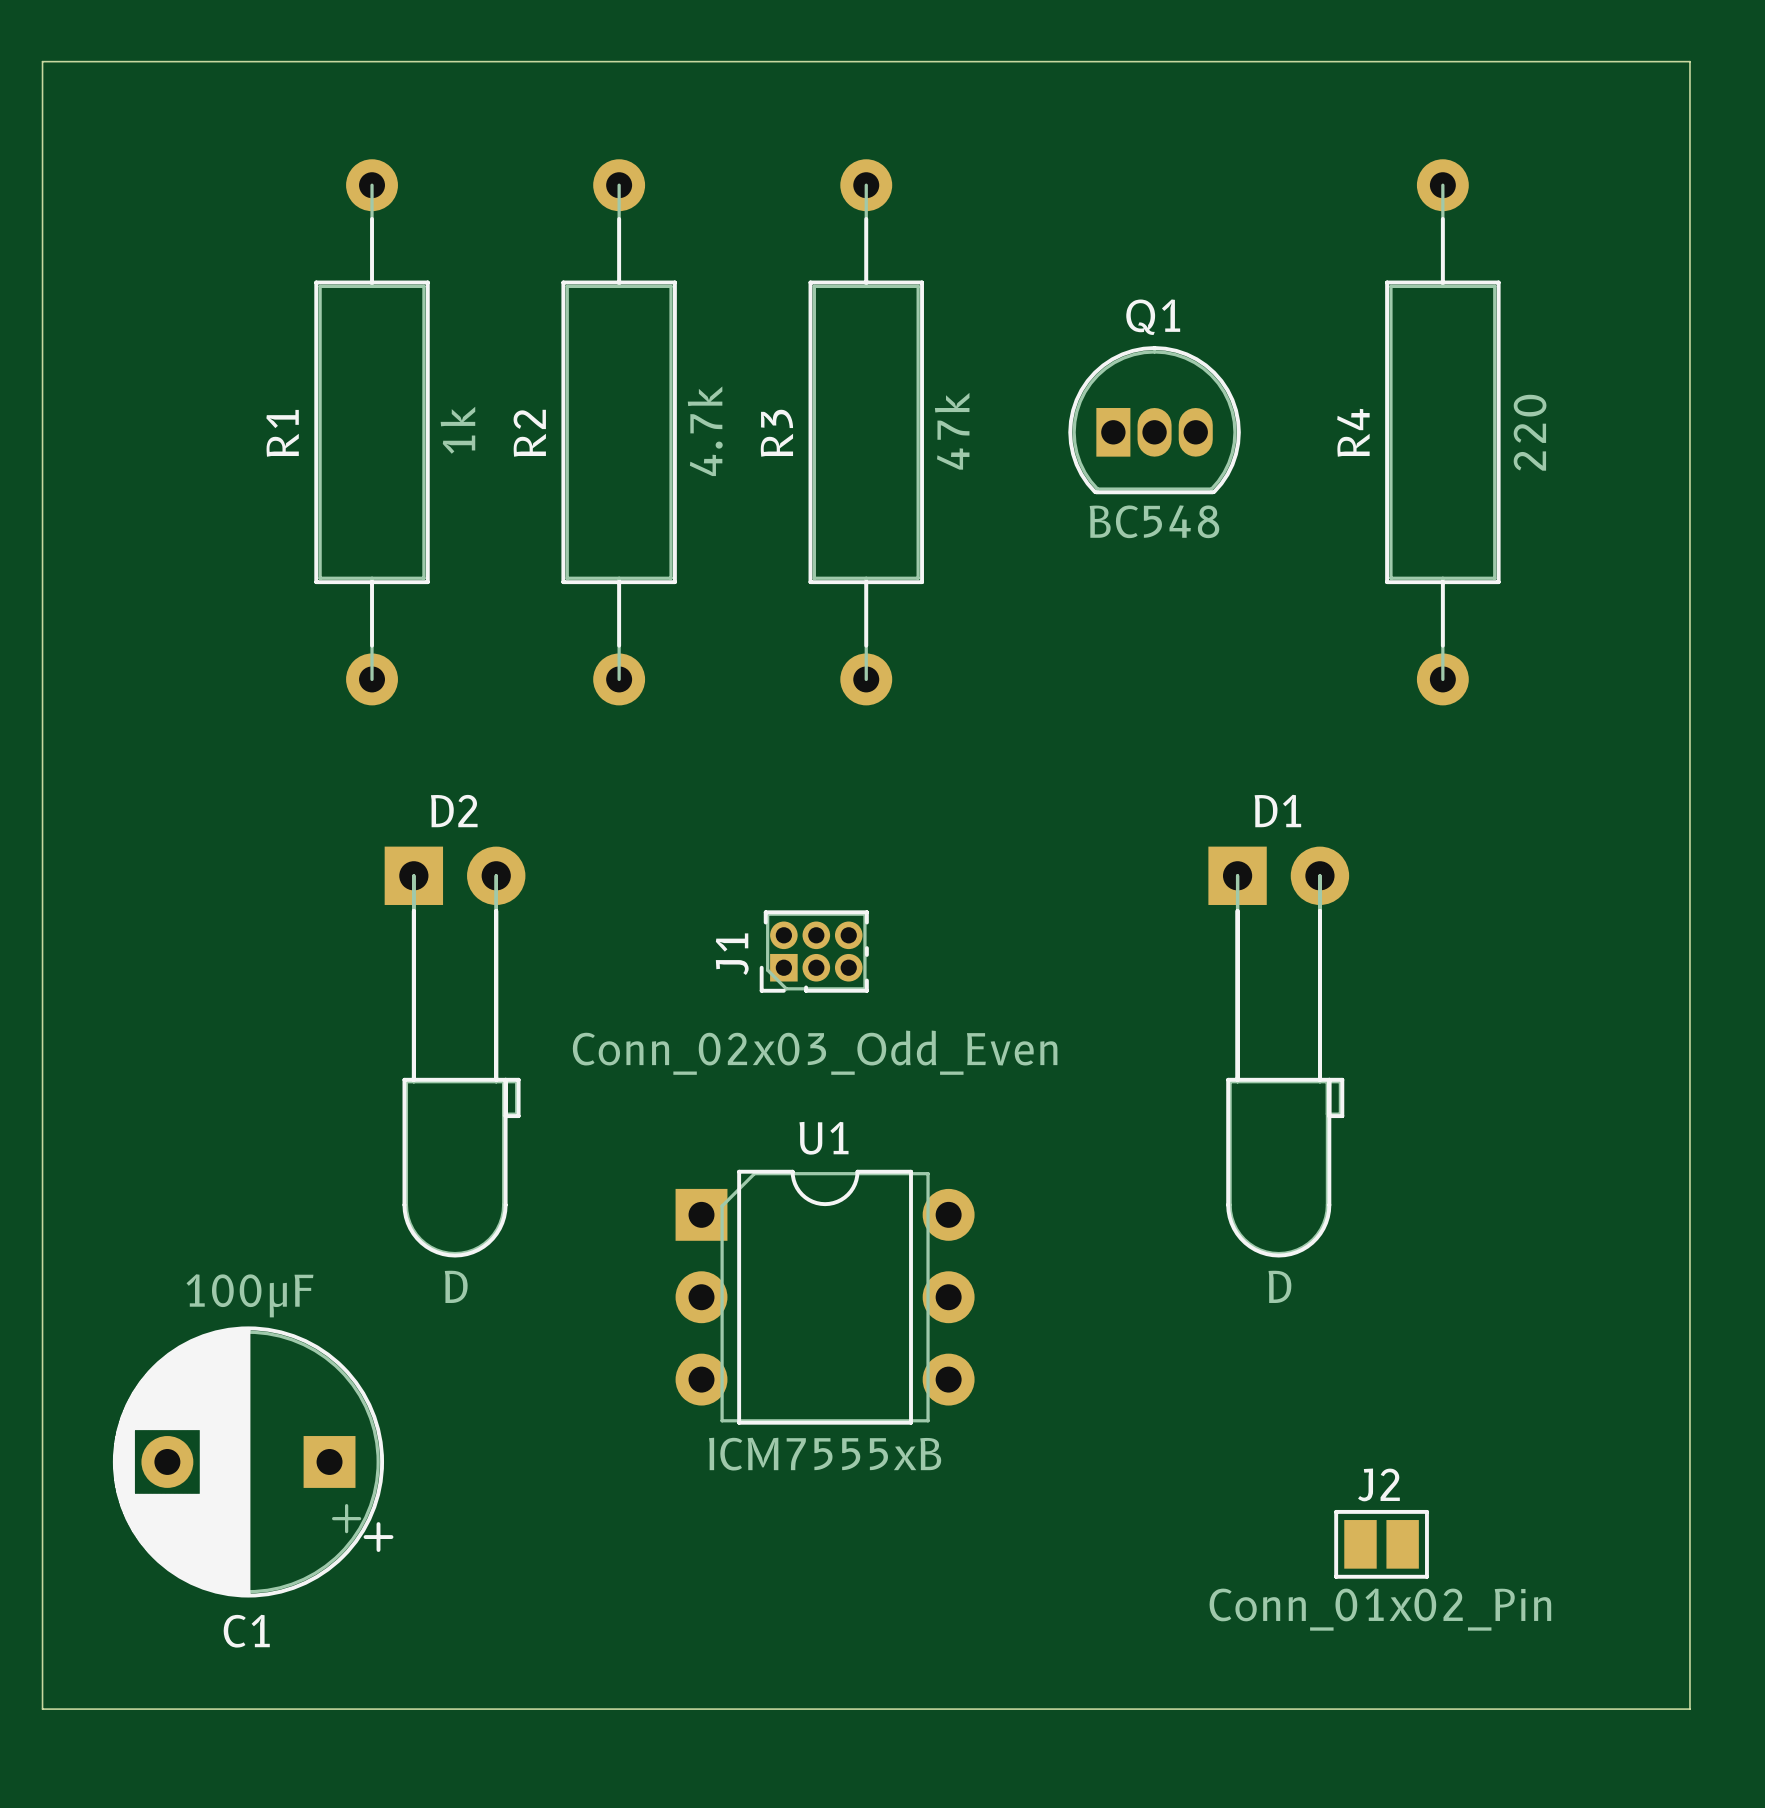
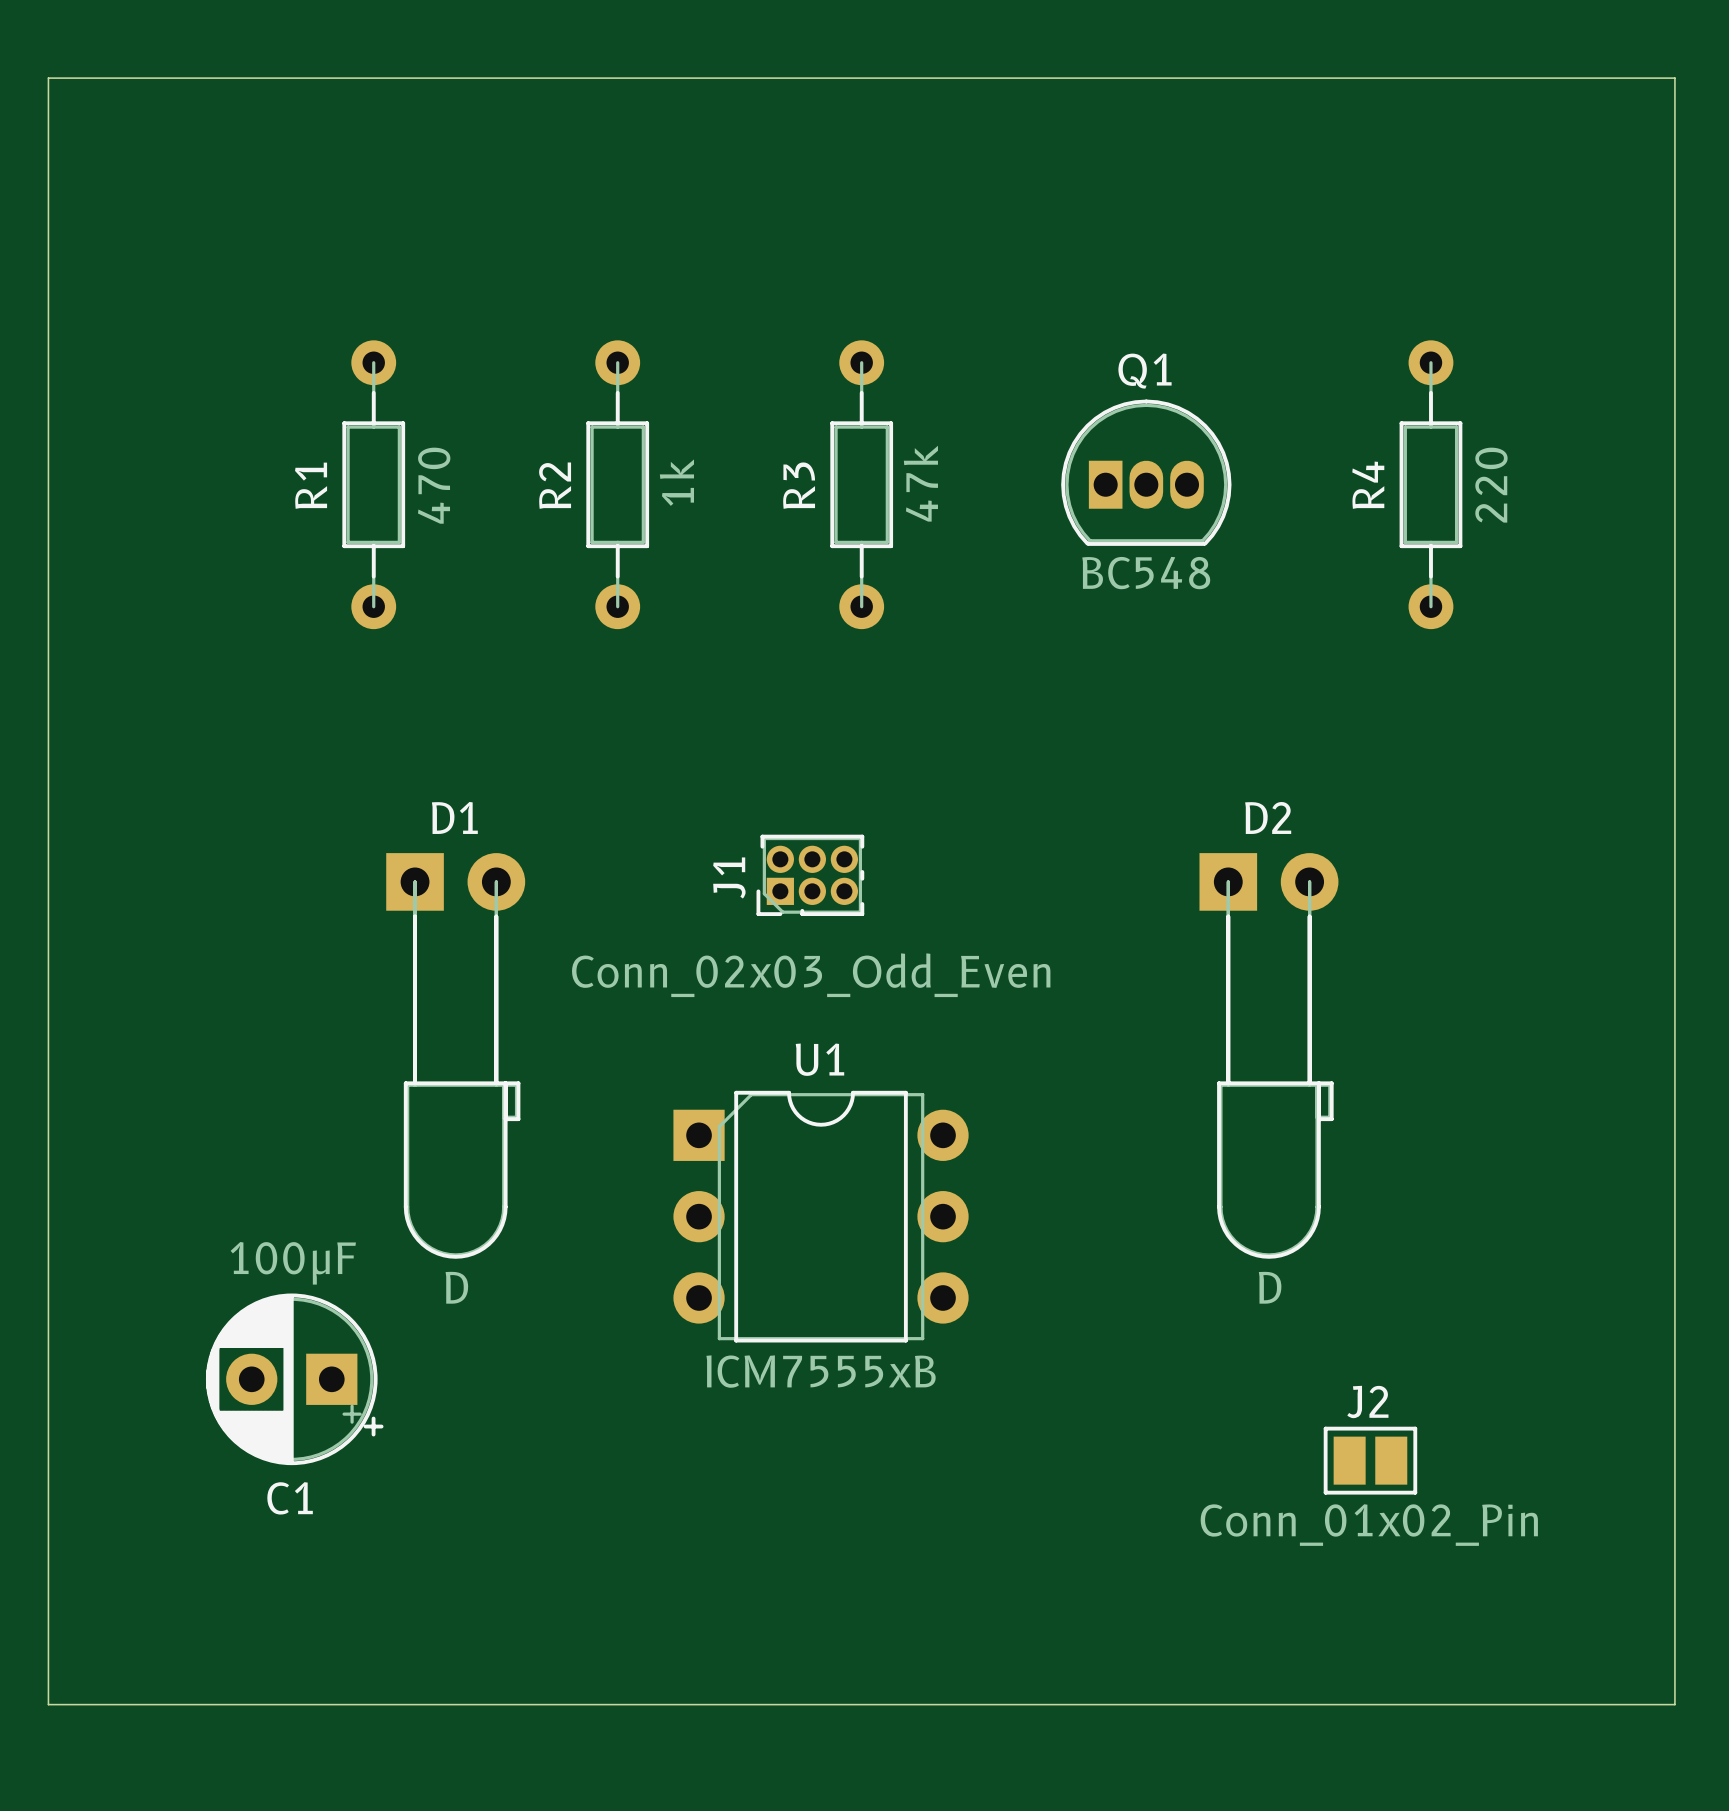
R1 footprint: [314, 159, 430, 706] -> [342, 340, 406, 630]
R2 footprint: [561, 159, 677, 706] -> [586, 340, 650, 630]
R3 footprint: [808, 159, 924, 706] -> [830, 340, 894, 630]
R4 footprint: [1385, 159, 1501, 706] -> [1399, 340, 1463, 630]
Q1 position: (1154, 420) -> (1146, 472)
R1 value: 1k (457, 430) -> 470 (434, 485)
R2 value: 4.7k (705, 431) -> 1k (676, 482)
D2 name: D2 (454, 811) -> D1 (454, 817)
D1 name: D1 (1277, 811) -> D2 (1268, 817)
J1 position: (814, 951) -> (810, 875)
U1 position: (825, 1297) -> (821, 1216)
C1 footprint: [112, 1326, 394, 1598] -> [205, 1293, 384, 1466]
J2 position: (1381, 1544) -> (1370, 1460)

